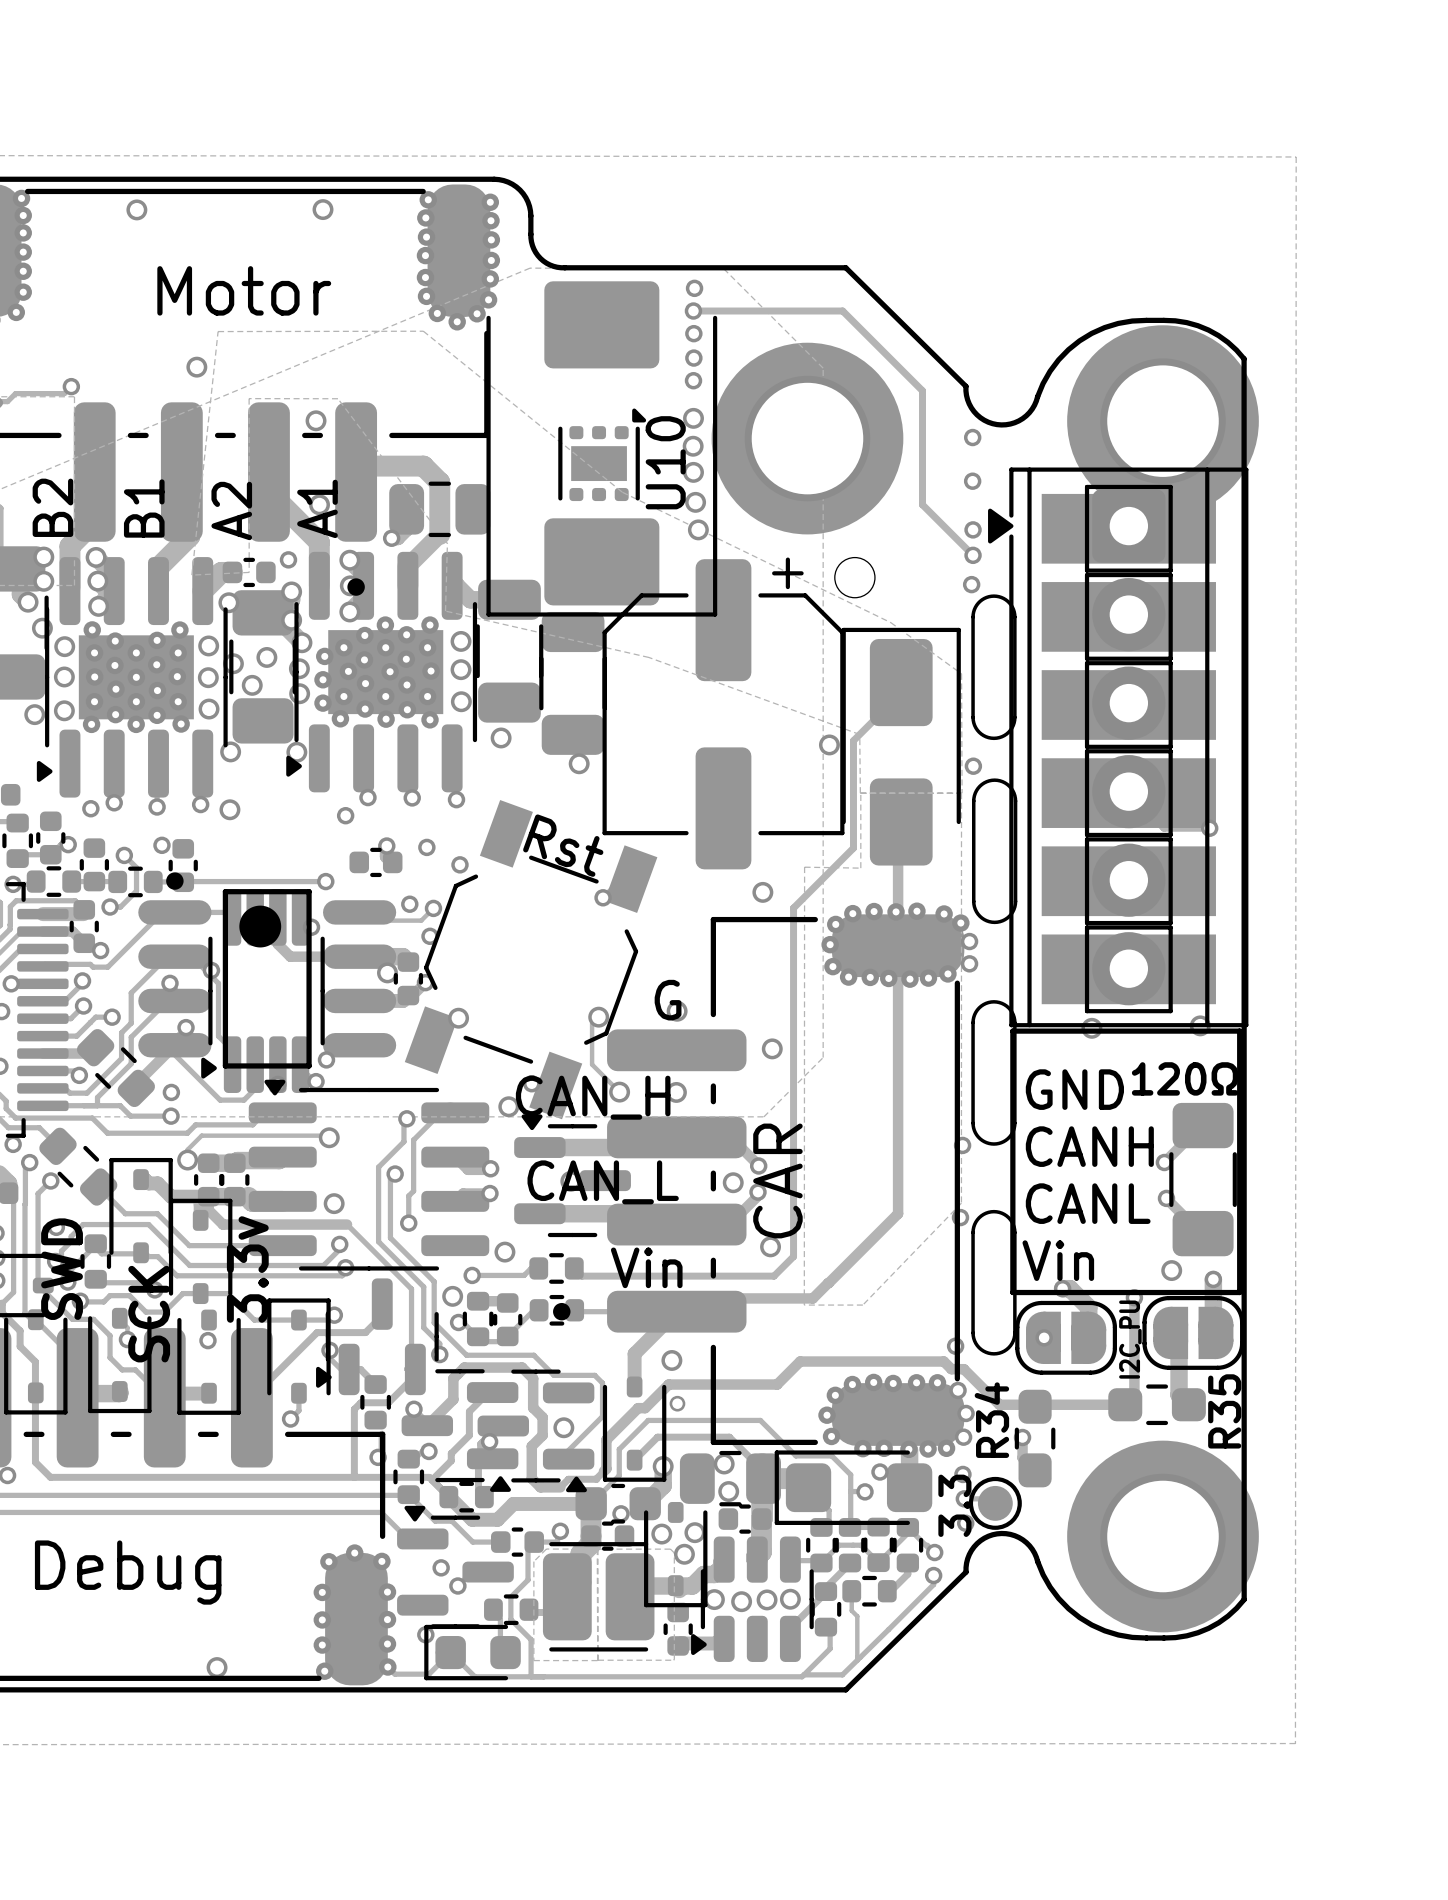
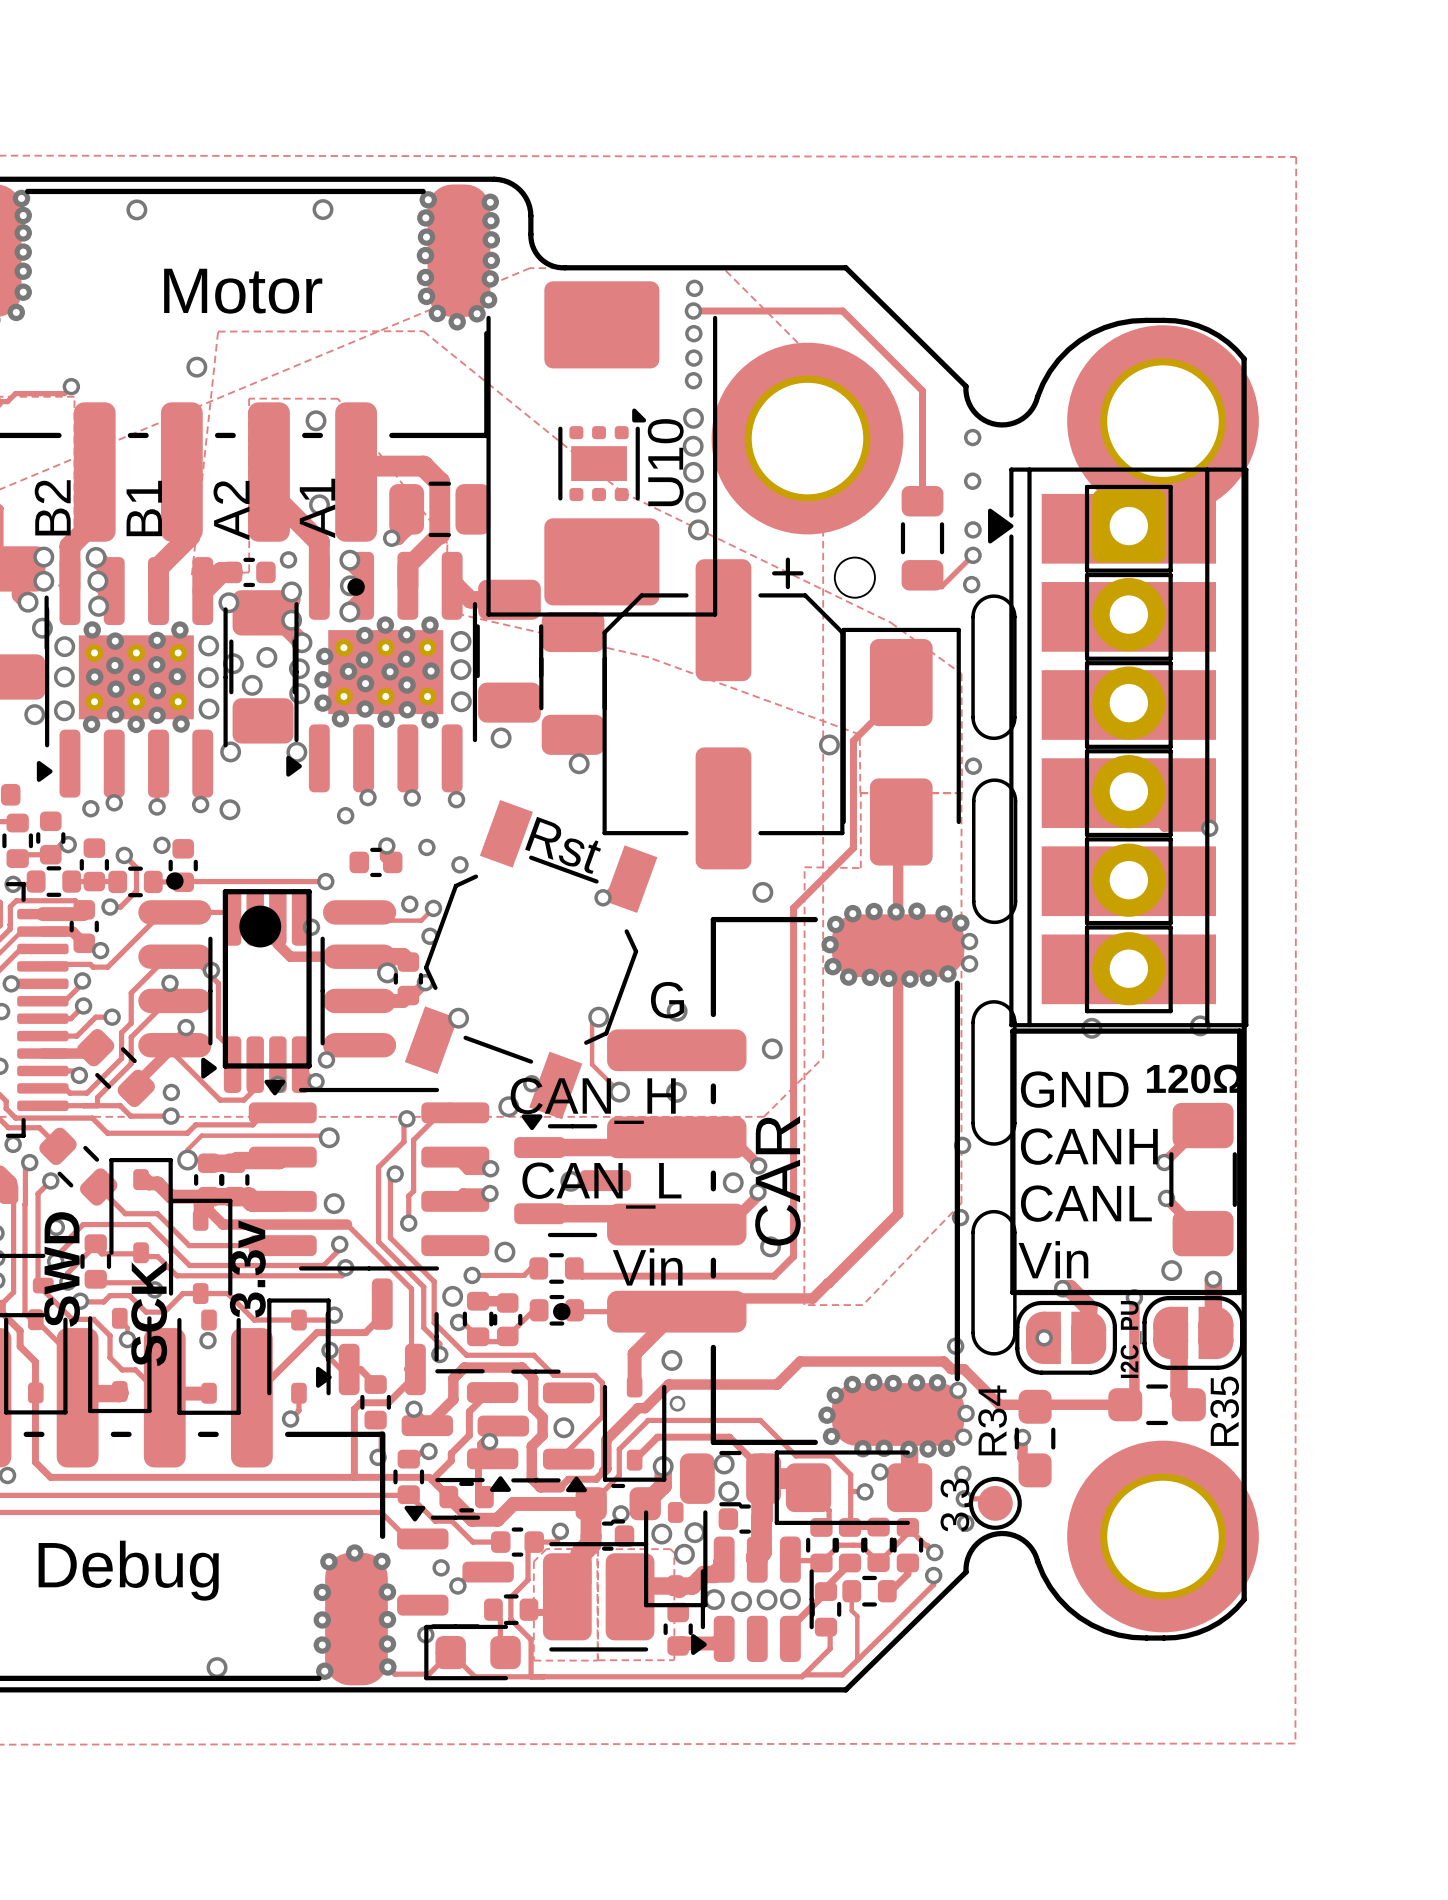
track: (922, 501) (922, 504) (973, 555) -> (922, 575) (933, 586) (941, 586) (973, 555)
part: none -> (922, 538)

